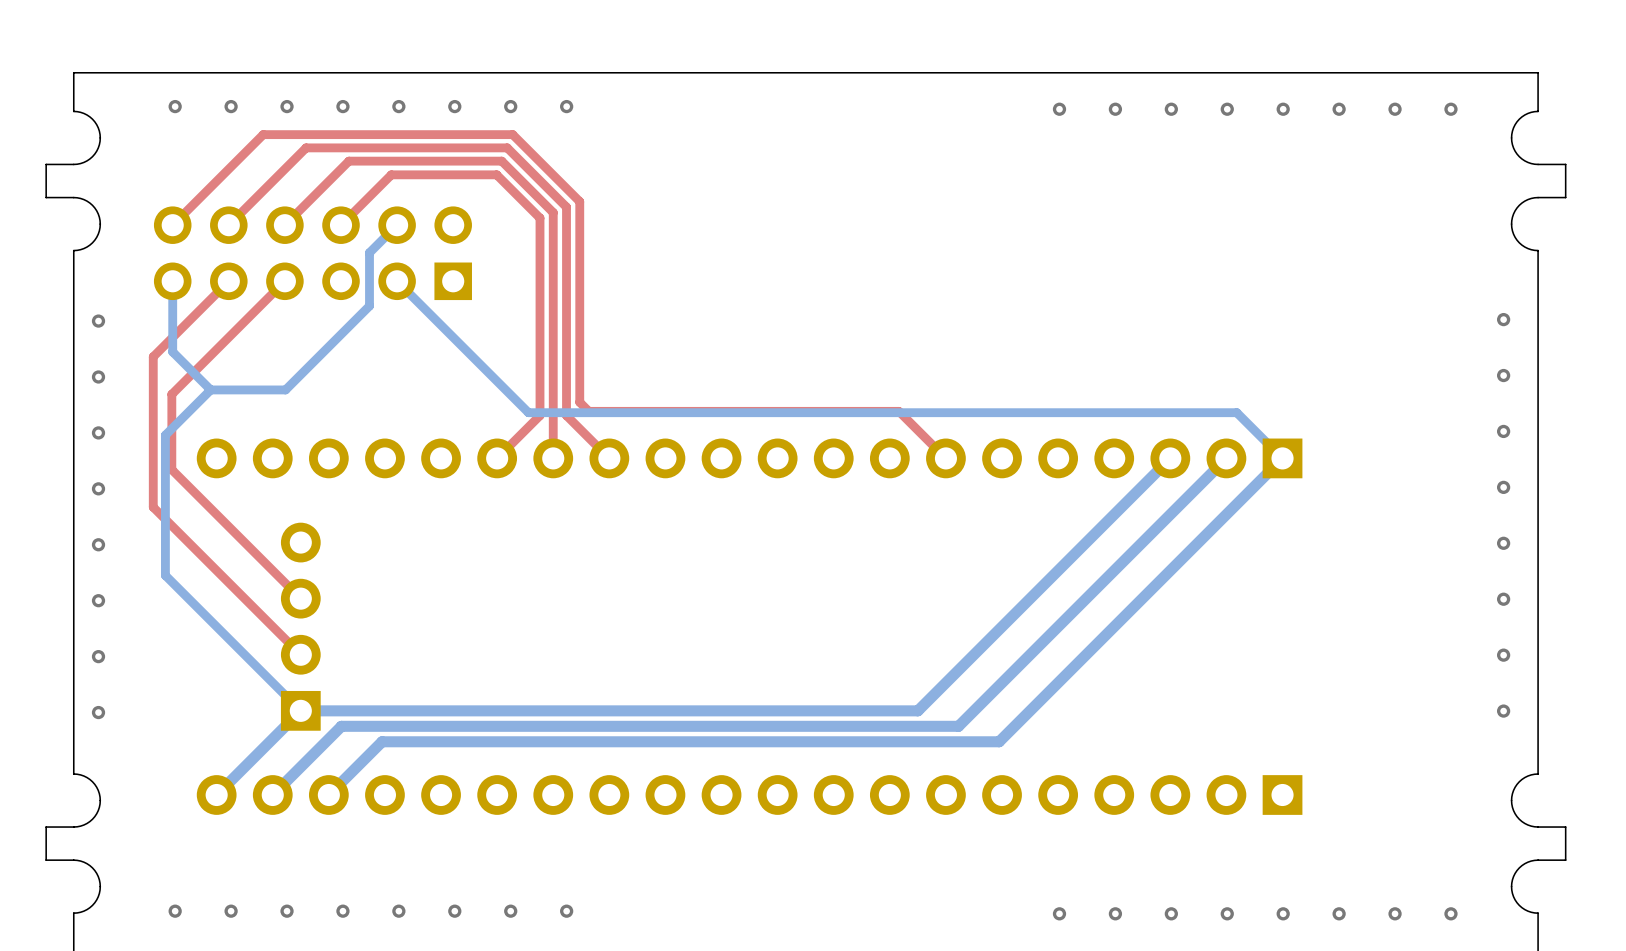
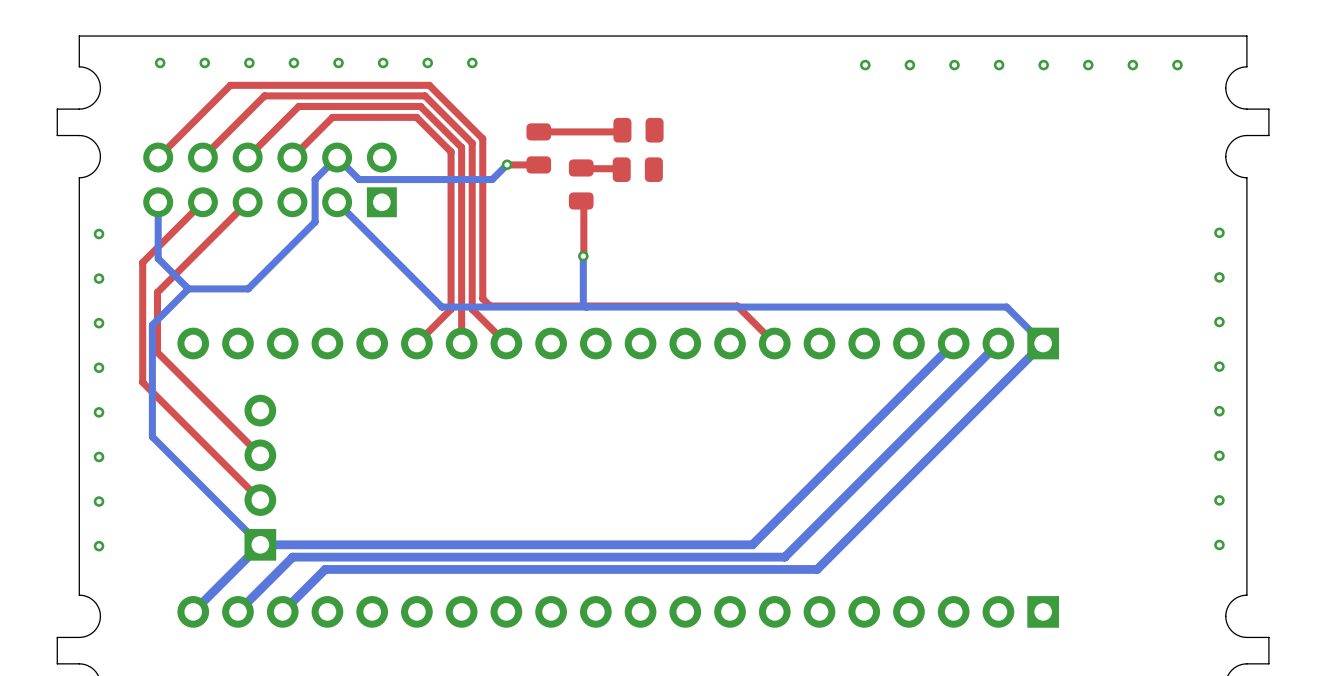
top track: none -> (622, 130) (620, 131) (538, 131)
part: none -> (638, 130)
part: none -> (538, 148)
bottom track: none -> (337, 157) (359, 179) (492, 179) (507, 164)
via: none -> (507, 164)
top track: none -> (538, 164) (507, 164)
top track: none -> (583, 168) (621, 169)
part: none -> (637, 169)
part: none -> (581, 184)
top track: none -> (583, 201) (583, 257)
bottom track: none -> (583, 256) (583, 304) (586, 307)
via: none -> (583, 256)

